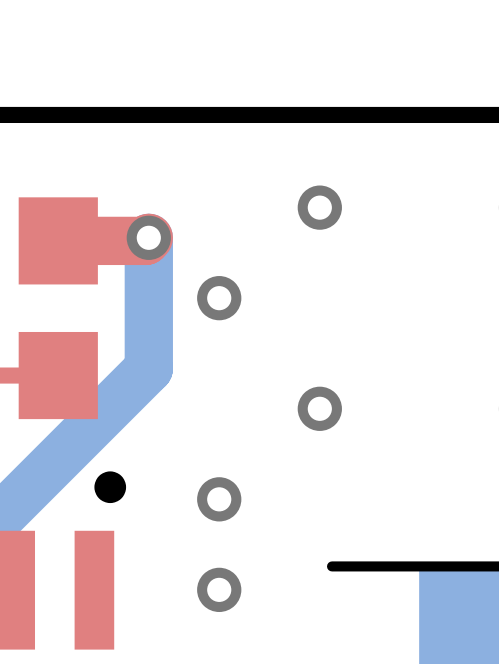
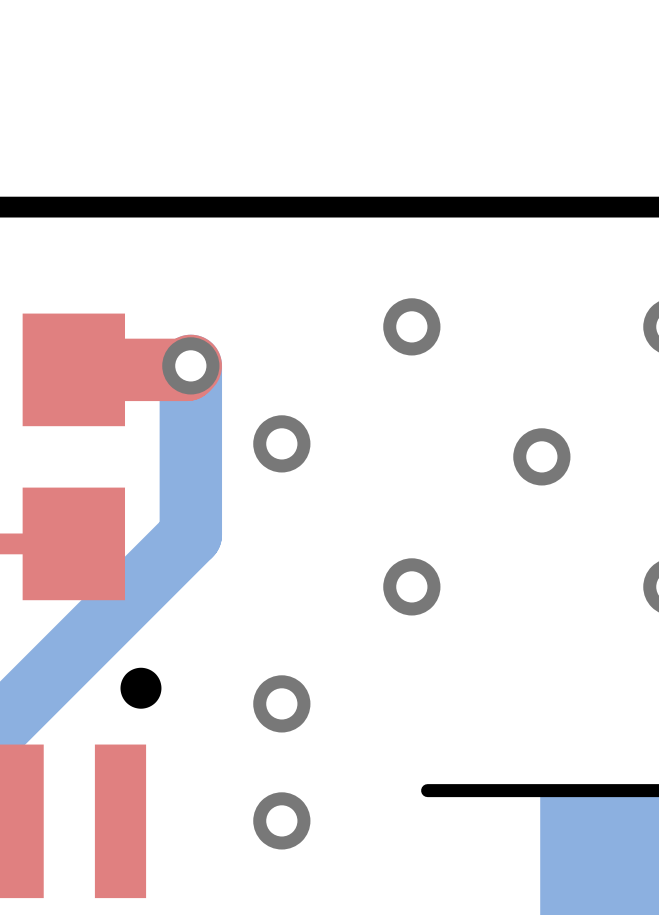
via: none -> (541, 456)

